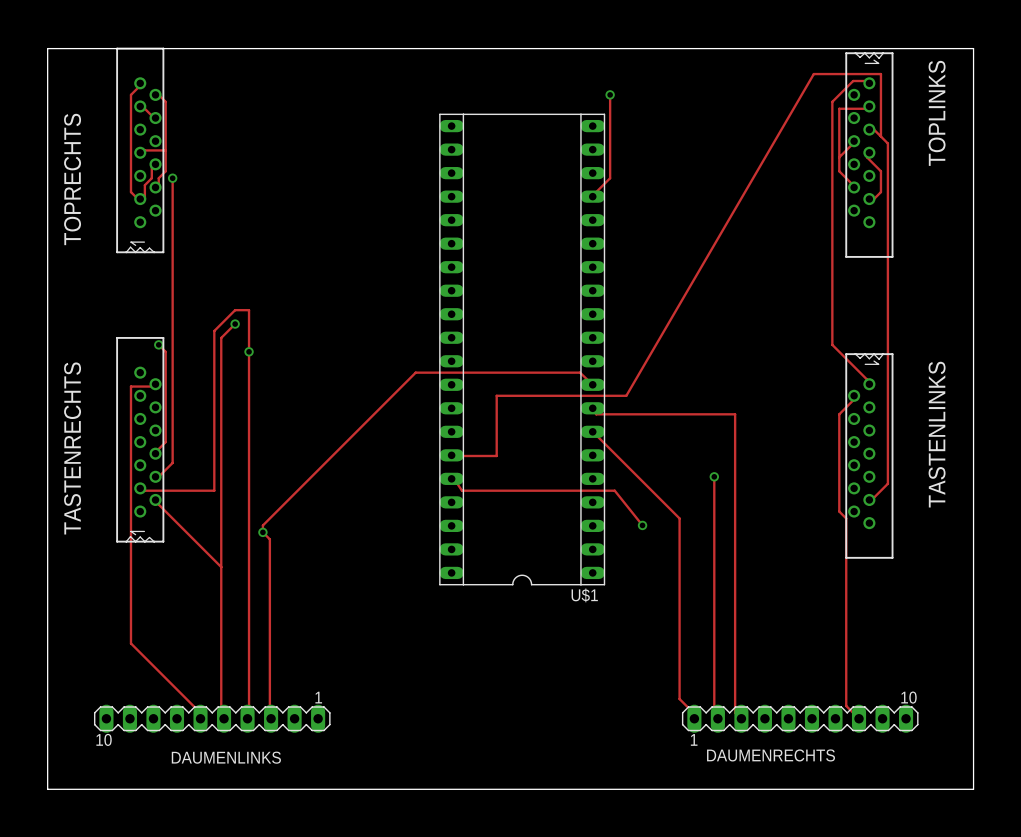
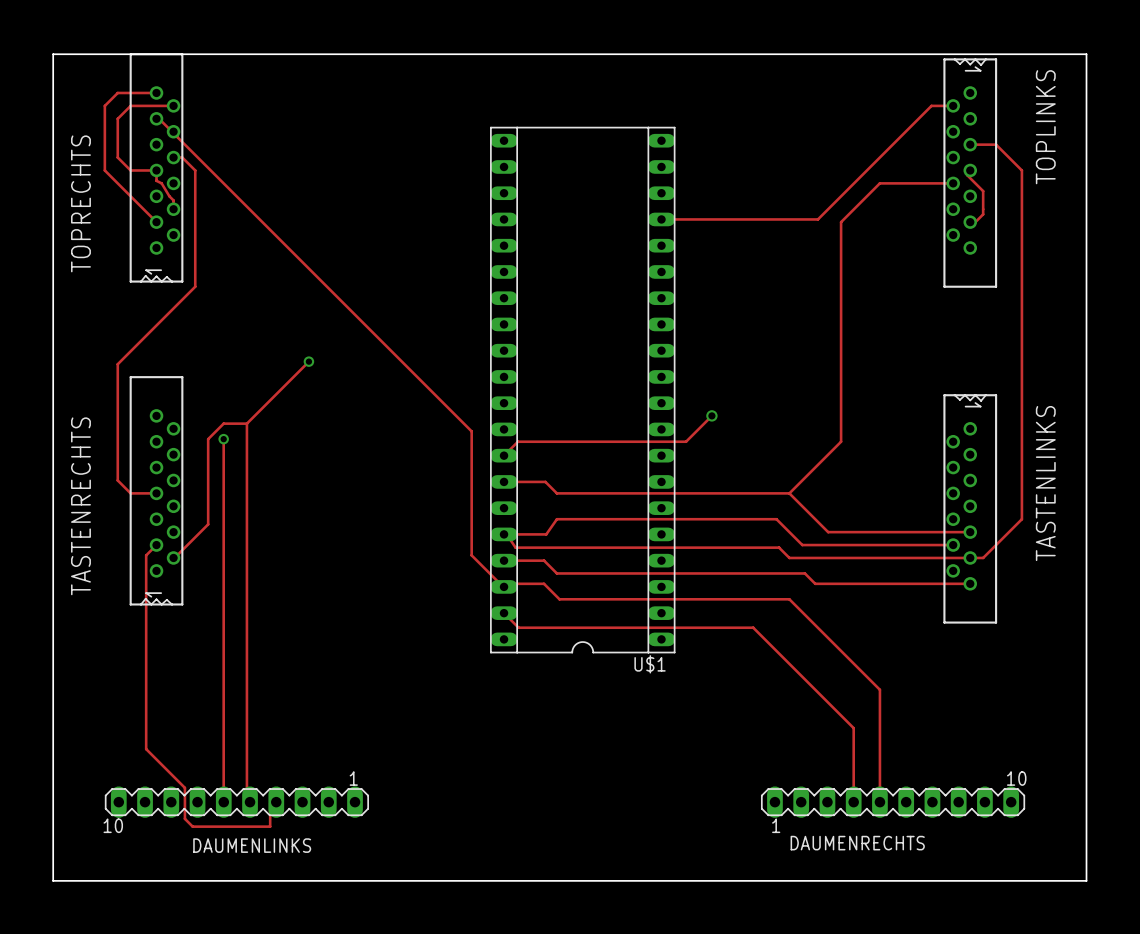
track: (140, 83) (130, 94) (130, 192) (137, 199) (144, 199) (144, 185) (151, 178) (151, 164) (155, 164) -> (156, 92) (117, 92) (104, 105) (104, 170) (156, 222)
track: (869, 83) (867, 81) (853, 81) (832, 101) (832, 344) (869, 384) -> none
track: (155, 94) (158, 94) (165, 101) (165, 171) (158, 178) (158, 185) (155, 187) -> (173, 105) (130, 105) (117, 118) (117, 157) (130, 170) (156, 170) (156, 180) (161, 183) (173, 200) (173, 209)
track: (610, 94) (610, 178) (592, 196) -> (953, 105) (931, 105) (817, 219) (661, 219)
via: (610, 94) -> none
track: (869, 106) (867, 108) (839, 108) (839, 171) (854, 187) -> none
track: none -> (173, 131) (471, 431) (471, 555) (502, 586) (507, 583) (544, 583) (559, 599) (789, 599) (879, 689) (879, 802)
track: (874, 129) (887, 143) (887, 483) (869, 499) -> (975, 144) (996, 144) (1021, 170) (1021, 519) (983, 557) (789, 557) (779, 547) (686, 547)
track: (880, 136) (880, 74) (813, 74) (626, 395) (614, 395) -> (711, 415) (686, 441)
track: none -> (173, 157) (182, 157) (195, 170) (195, 286) (117, 364) (117, 480) (130, 493) (156, 493)
track: (854, 141) (839, 157) -> none
track: (165, 150) (144, 150) (140, 152) -> none
track: none -> (953, 183) (879, 183) (841, 222) (841, 441) (789, 493)
track: (172, 178) (172, 462) (158, 476) (155, 476) -> none
via: (172, 178) -> none
track: (235, 324) (221, 337) (221, 379) -> none
via: (235, 324) -> none
via: none -> (308, 361)
track: (158, 344) (165, 351) (165, 442) (155, 453) -> none
via: (158, 344) -> none
via: (249, 351) -> none
via: none -> (711, 415)
track: (155, 384) (151, 386) (130, 386) (130, 497) -> (156, 545) (146, 555)
track: (592, 384) (580, 372) (415, 372) (262, 525) (262, 532) (269, 539) (271, 718) -> none
track: none -> (223, 439) (223, 795)
via: none -> (223, 439)
track: (496, 395) (496, 455) (451, 455) -> (554, 441) (517, 441) (504, 455)
track: (854, 395) (853, 400) (839, 414) (839, 511) (846, 518) (846, 705) (859, 718) -> none
track: (592, 408) (596, 414) (735, 414) (735, 712) (741, 718) -> none
track: none -> (504, 481) (545, 481) (556, 493) (789, 493)
track: (592, 431) (679, 518) (679, 699) (693, 712) (694, 718) -> none
track: none -> (789, 493) (828, 532) (970, 532)
track: (714, 476) (714, 712) (717, 718) -> none
via: (714, 476) -> none
track: none -> (504, 534) (546, 534) (556, 519) (776, 519) (802, 545) (953, 545)
track: (140, 488) (144, 490) (214, 490) (214, 330) (235, 310) (249, 310) (247, 718) -> none
track: (614, 490) (642, 525) -> none
track: (155, 499) (221, 567) -> (173, 557) (208, 524) (208, 439) (223, 423) (246, 423) (308, 361)
track: none -> (504, 560) (544, 560) (556, 573) (804, 573) (815, 583) (970, 583)
via: (642, 525) -> none
via: (262, 532) -> none
track: none -> (504, 613) (518, 627) (753, 627) (853, 728) (853, 802)
track: (130, 643) (200, 712) -> (146, 718) (146, 749) (184, 787) (184, 818) (192, 826) (270, 826) (270, 803) (276, 802)

